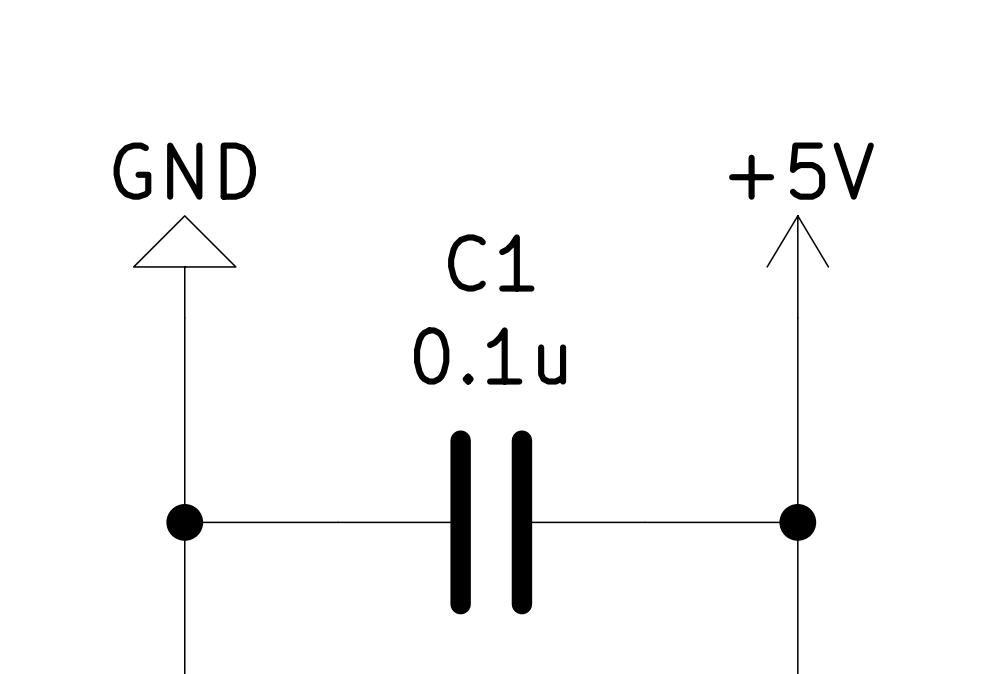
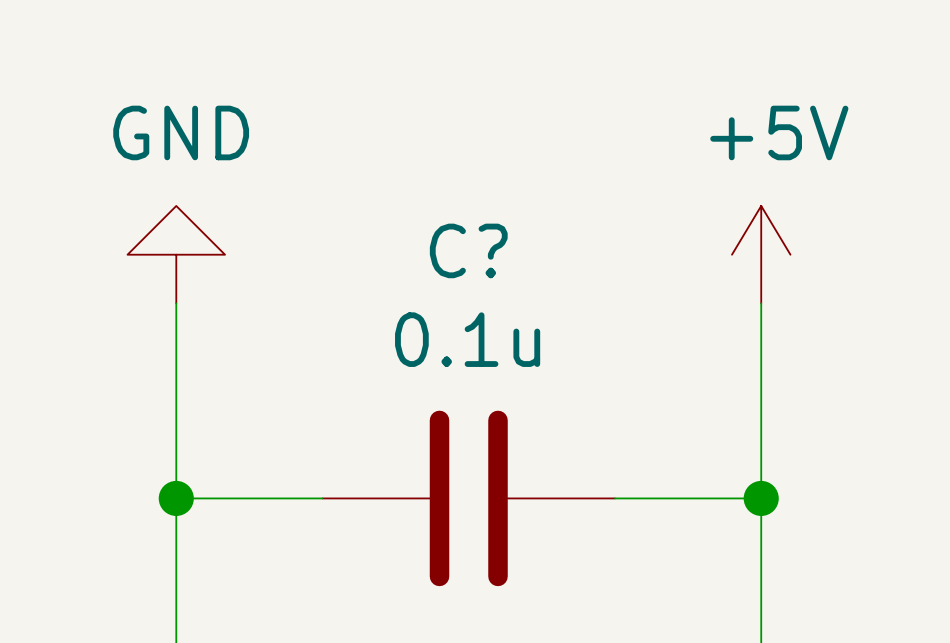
power symbol text position: GND (184, 171) -> GND (181, 132)
power symbol text position: +5V (801, 171) -> +5V (779, 132)
C1 name: C1 (491, 263) -> C? (468, 250)

